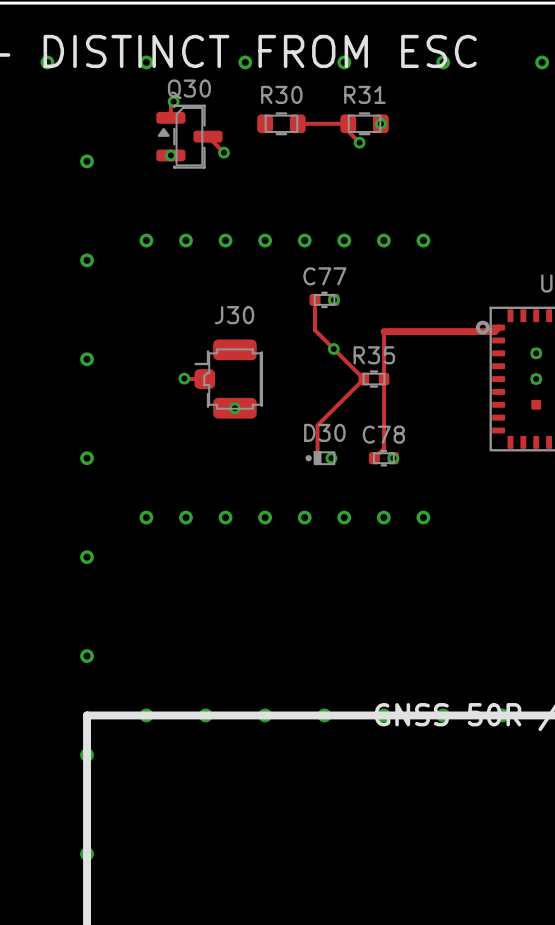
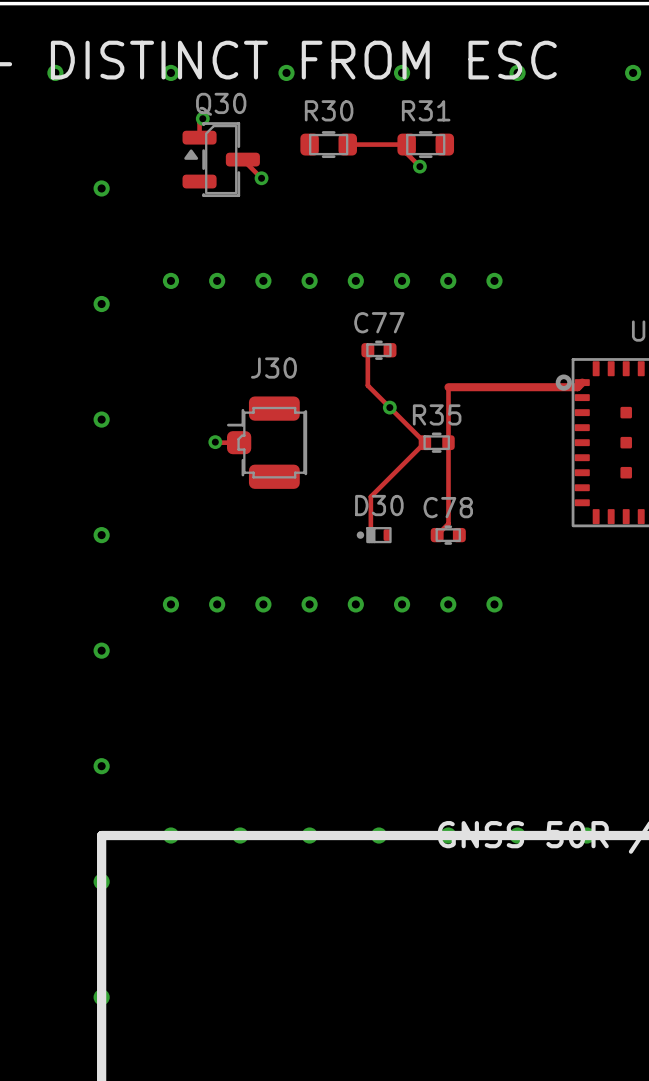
via: (380, 123) -> none
via: (170, 155) -> none
via: (333, 299) -> none
via: (536, 353) -> none
via: (536, 379) -> none
via: (234, 408) -> none
via: (331, 458) -> none
via: (393, 458) -> none

